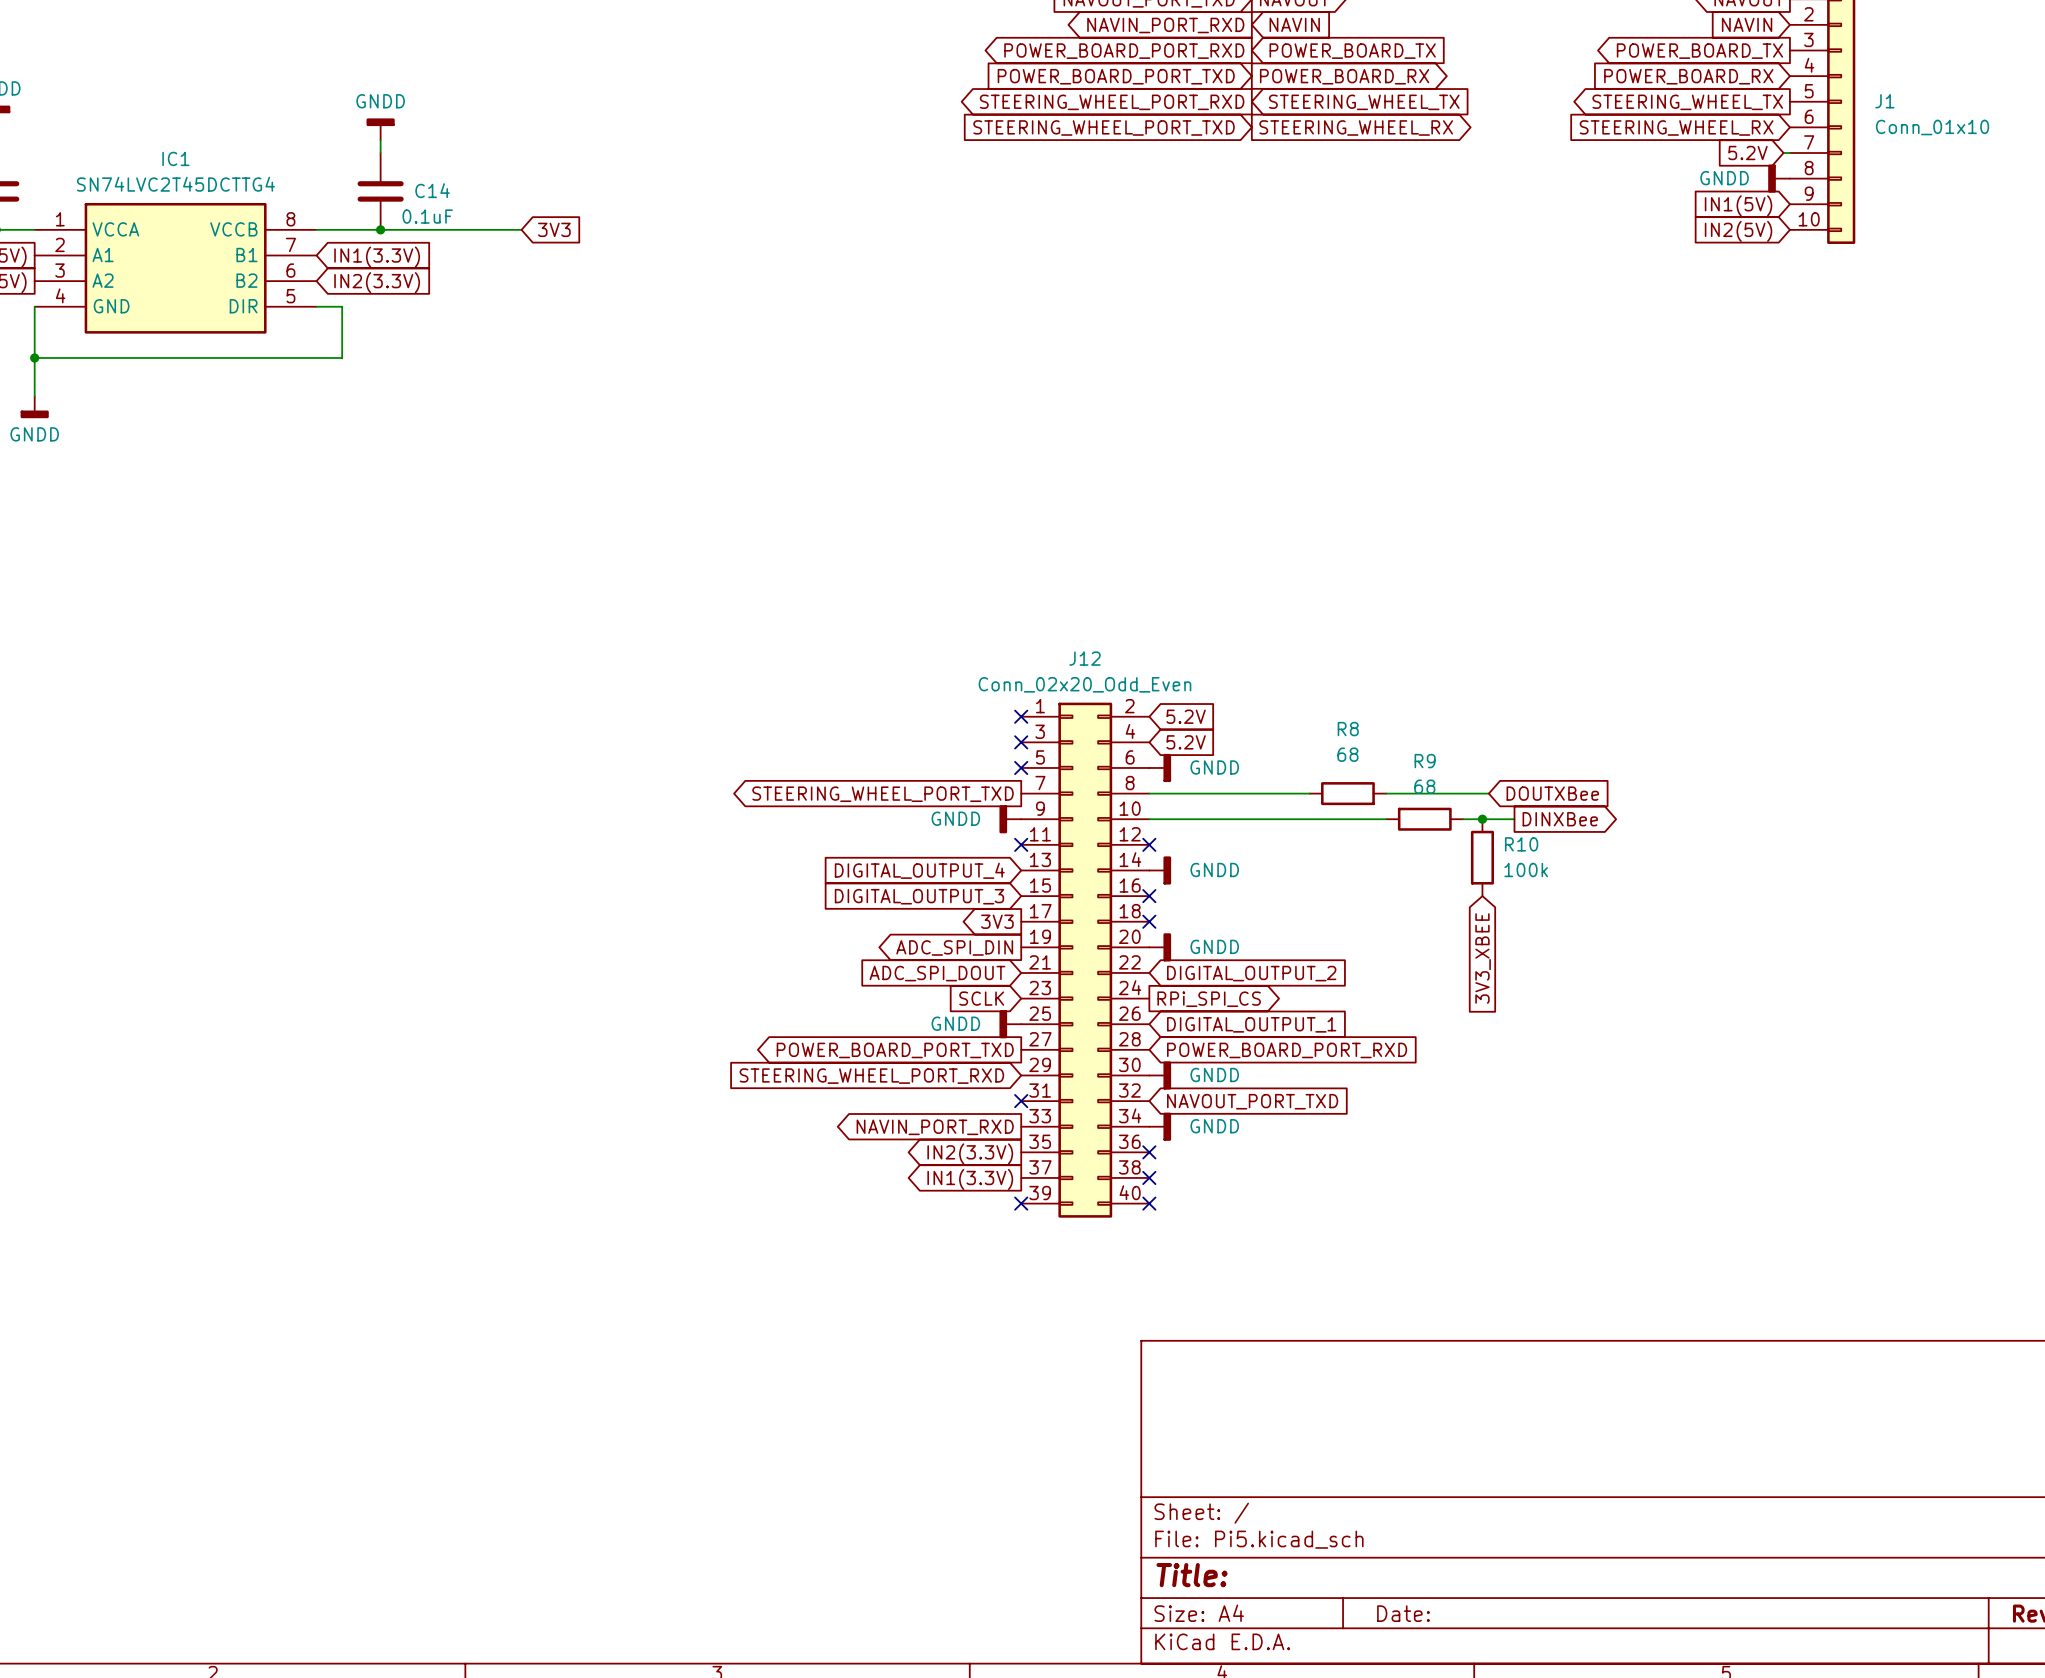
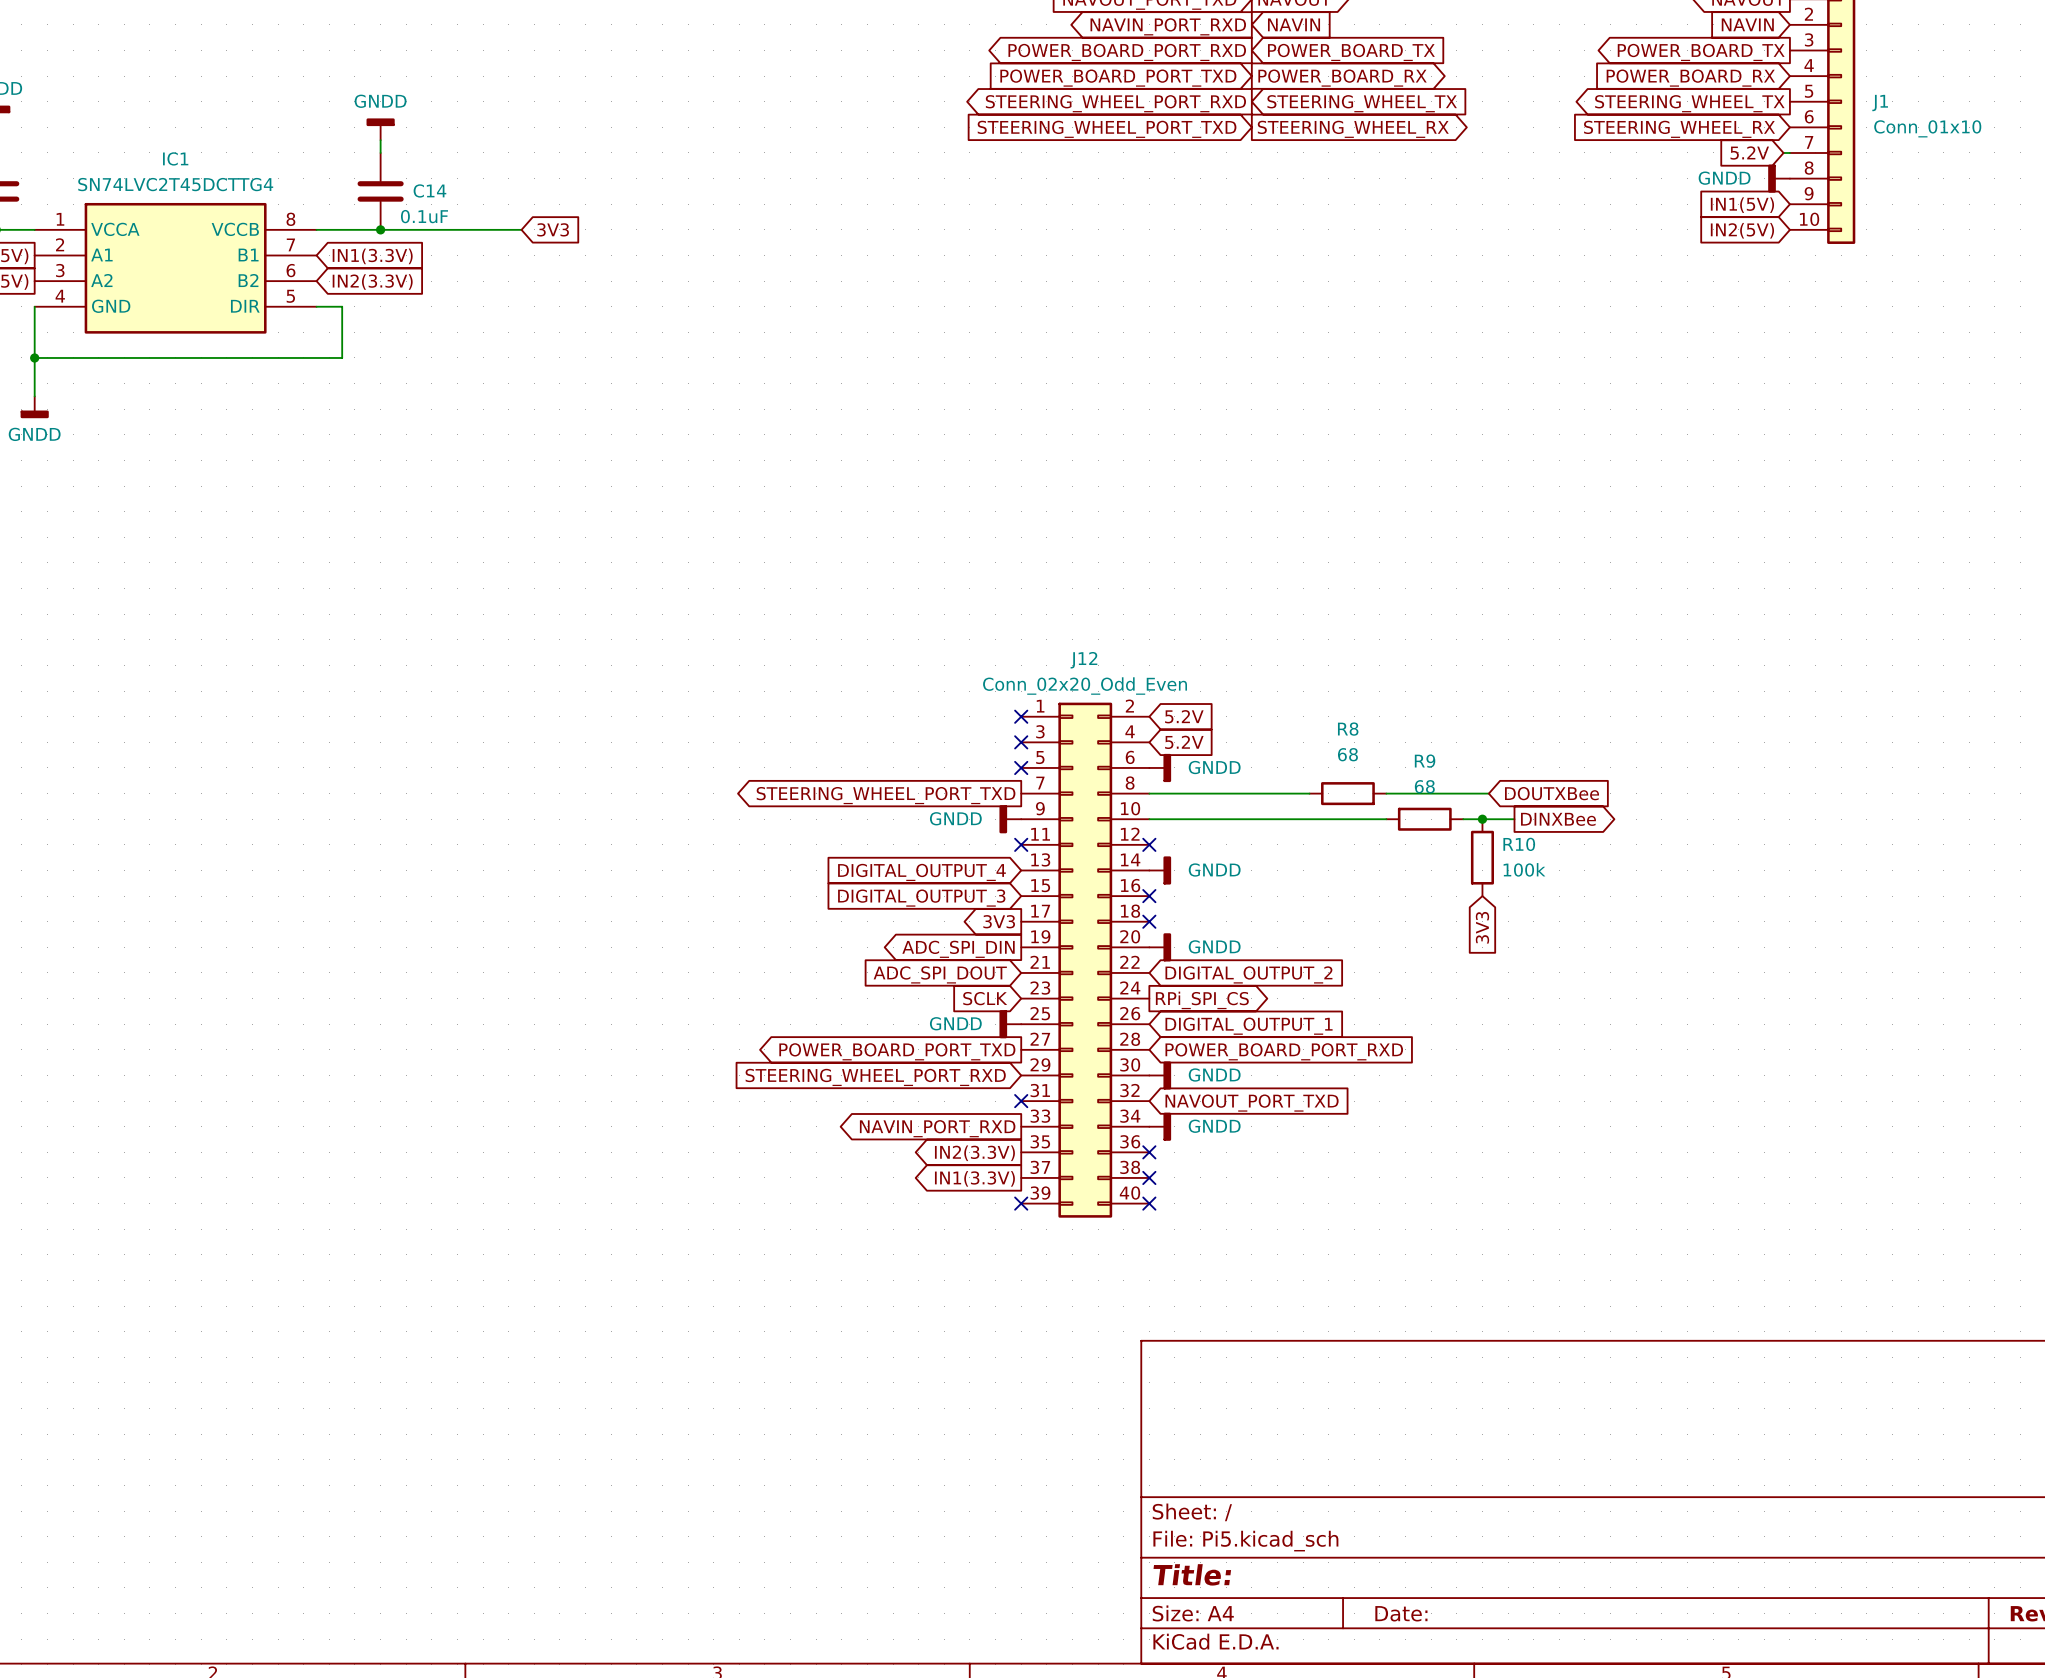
global label: 3V3_XBEE (1483, 958) -> 3V3 (1482, 927)

